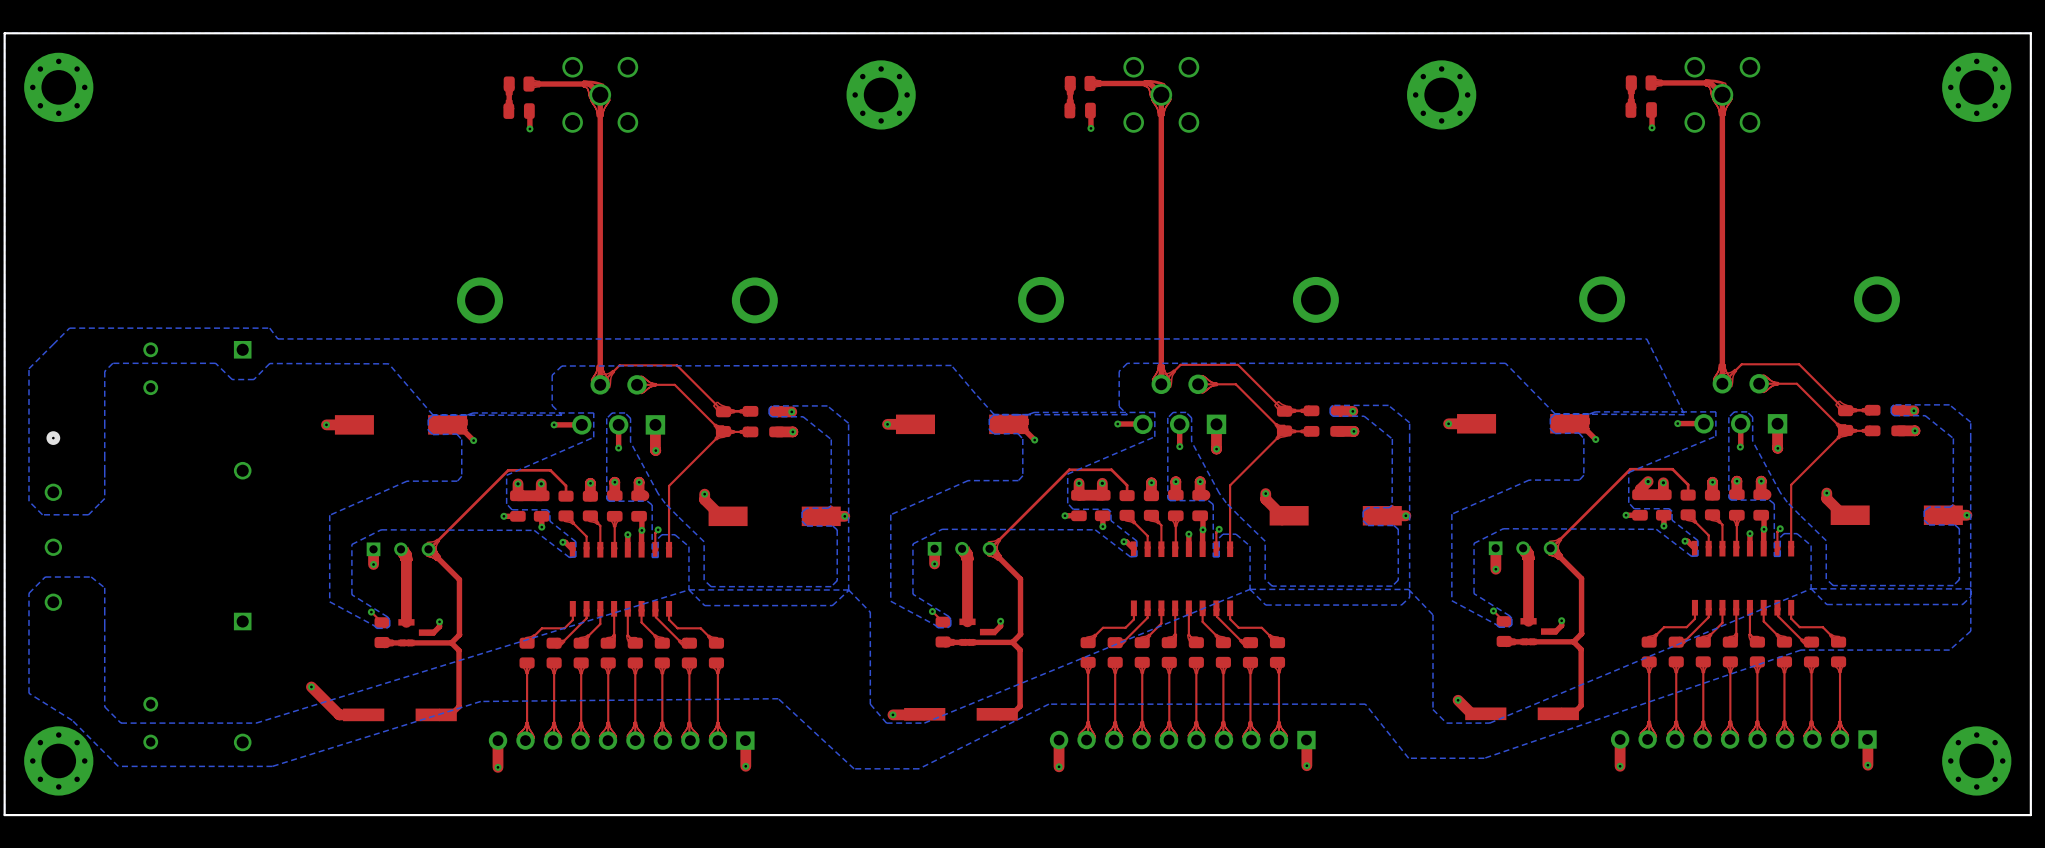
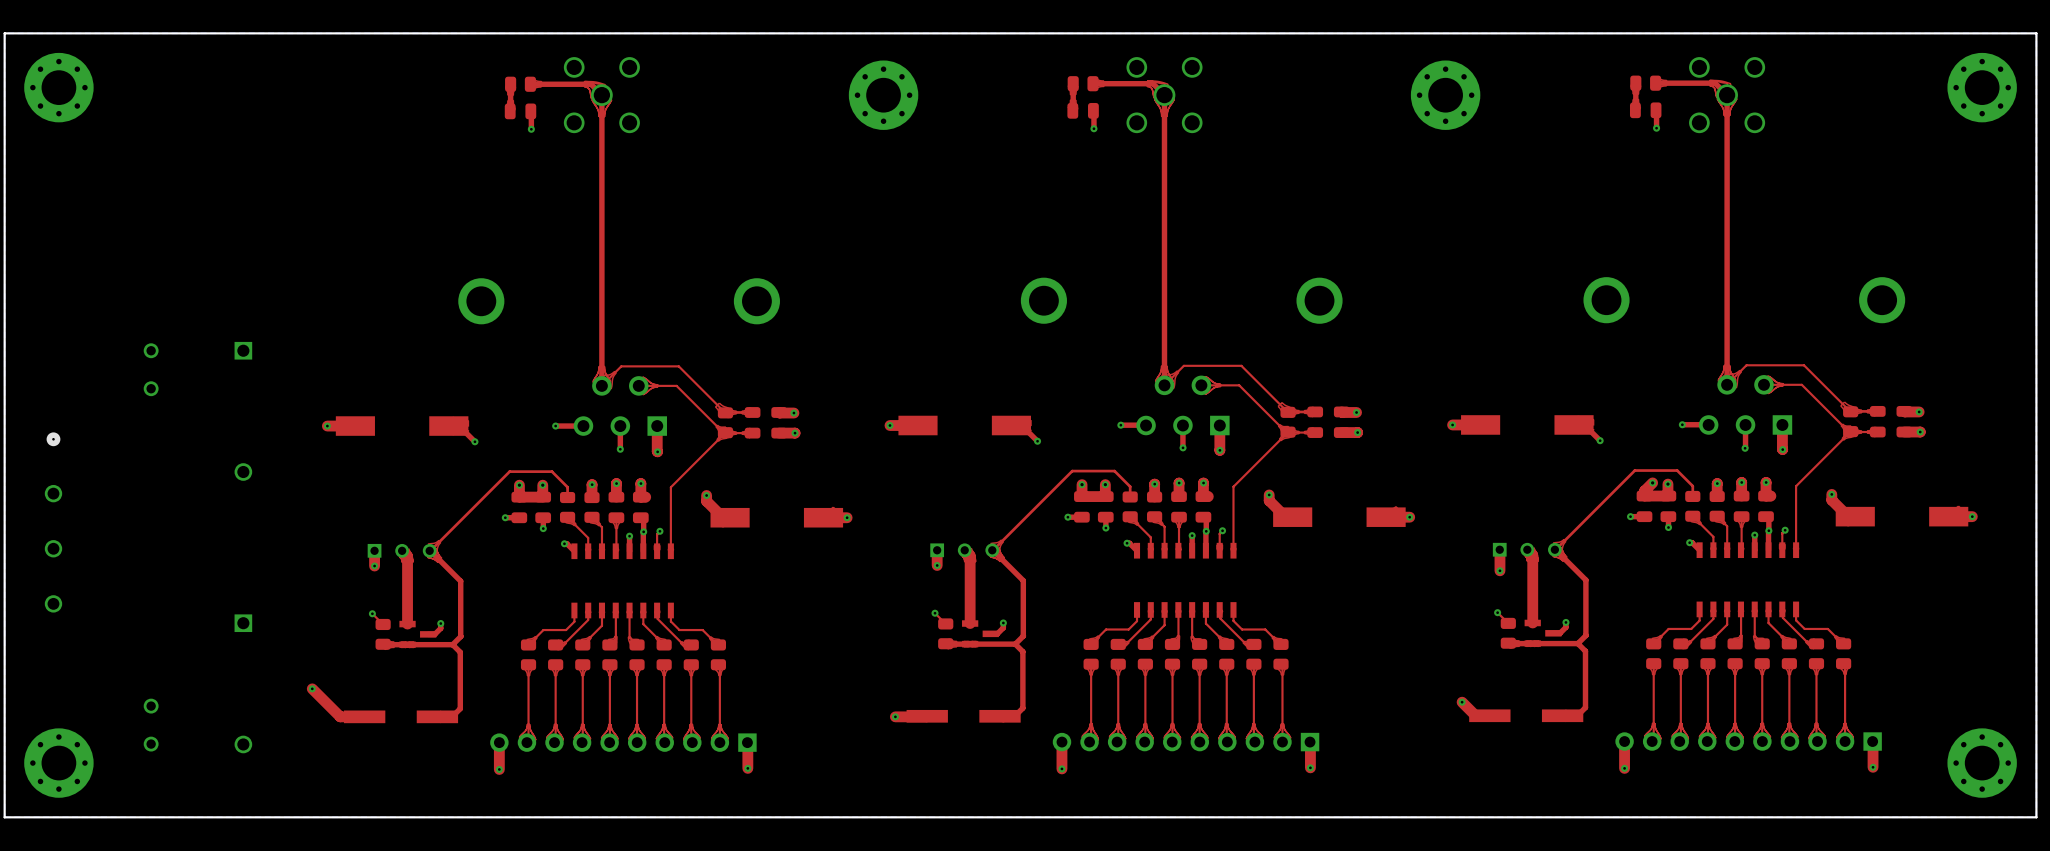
bottom zone outline: (994, 414) (1028, 414) (1034, 412) (1154, 412) (1154, 436) (1067, 474) (1067, 503) (1073, 509) (1108, 509) (1110, 511) (1110, 520) (1136, 541) (1136, 556) (1130, 556) (1095, 529) (942, 529) (912, 543) (912, 594) (950, 619) (950, 625) (947, 627) (937, 627) (890, 601) (890, 514) (968, 480) (1018, 480) (1022, 475) (1022, 438) (1017, 433) (994, 434) (989, 429) (989, 418) (994, 414) -> none
bottom zone outline: (994, 414) (951, 365) (561, 366) (552, 375) (552, 405) (561, 415) (433, 415) -> none
bottom zone outline: (1555, 414) (1589, 414) (1595, 411) (1715, 411) (1715, 436) (1628, 472) (1628, 502) (1634, 508) (1669, 508) (1672, 511) (1672, 520) (1698, 540) (1698, 555) (1691, 556) (1656, 529) (1503, 528) (1474, 543) (1474, 593) (1511, 618) (1511, 625) (1508, 627) (1498, 627) (1451, 600) (1451, 514) (1529, 480) (1579, 480) (1583, 475) (1583, 438) (1578, 433) (1555, 433) (1550, 429) (1550, 418) (1555, 414) -> none
bottom zone outline: (1555, 414) (1684, 414) (1646, 338) (277, 338) (269, 328) (69, 328) (28, 368) (28, 501) (42, 514) (88, 514) (104, 498) (104, 371) (112, 363) (215, 363) (232, 379) (253, 379) (269, 363) (388, 363) (433, 415) -> none
bottom zone outline: (1555, 414) (1505, 363) (1127, 363) (1119, 371) (1119, 406) (1127, 414) (994, 414) -> none
bottom zone outline: (433, 415) (467, 415) (473, 412) (593, 412) (593, 437) (506, 475) (506, 503) (512, 509) (547, 509) (549, 512) (549, 521) (575, 541) (575, 556) (569, 557) (534, 530) (381, 529) (351, 544) (351, 594) (389, 619) (389, 626) (386, 628) (376, 628) (329, 601) (329, 515) (407, 481) (457, 481) (461, 476) (461, 439) (456, 434) (433, 434) (428, 430) (428, 419) (433, 415) -> none
bottom zone outline: (1811, 588) (1811, 545) (1797, 533) (1784, 533) (1780, 537) (1780, 556) (1774, 556) (1774, 503) (1769, 500) (1731, 500) (1728, 497) (1728, 417) (1734, 411) (1747, 411) (1752, 417) (1752, 441) (1780, 492) (1787, 502) (1826, 540) (1826, 579) (1833, 585) (1953, 585) (1959, 579) (1959, 528) (1955, 524) (1929, 524) (1924, 520) (1924, 510) (1929, 507) (1950, 507) (1953, 504) (1953, 438) (1925, 415) (1893, 415) (1891, 412) (1891, 407) (1893, 404) (1949, 404) (1970, 422) (1970, 596) (1962, 604) (1826, 604) (1811, 588) -> none
bottom zone outline: (1811, 588) (1489, 723) (1446, 723) (1432, 709) (1432, 614) (1408, 589) (1250, 589) -> none
bottom zone outline: (1811, 588) (1970, 588) (1970, 631) (1949, 650) (1800, 650) (1484, 758) (1408, 758) (1365, 704) (1048, 704) (919, 768) (854, 768) (778, 698) (480, 701) (272, 766) (118, 766) (72, 720) (28, 693) (28, 593) (45, 577) (91, 577) (104, 587) (104, 706) (120, 723) (256, 723) (688, 589) -> none
bottom zone outline: (688, 589) (688, 546) (674, 534) (661, 534) (658, 538) (658, 557) (652, 557) (652, 504) (647, 501) (608, 501) (606, 499) (606, 418) (612, 412) (625, 412) (630, 418) (630, 442) (658, 493) (665, 503) (704, 541) (704, 580) (711, 586) (831, 586) (837, 580) (837, 529) (832, 526) (806, 526) (802, 521) (802, 511) (806, 508) (828, 508) (831, 505) (831, 439) (803, 416) (771, 416) (769, 414) (769, 408) (771, 405) (827, 405) (848, 423) (848, 590) (832, 605) (704, 605) (688, 589) -> none
bottom zone outline: (1250, 589) (924, 723) (886, 723) (870, 704) (870, 612) (848, 590) (688, 589) -> none
bottom zone outline: (1250, 589) (1250, 546) (1235, 534) (1222, 534) (1219, 537) (1219, 556) (1213, 556) (1213, 504) (1208, 500) (1169, 500) (1167, 498) (1167, 417) (1173, 412) (1186, 412) (1191, 417) (1191, 441) (1219, 493) (1226, 502) (1265, 541) (1265, 579) (1272, 586) (1392, 586) (1398, 580) (1398, 529) (1393, 525) (1367, 525) (1363, 520) (1363, 511) (1367, 507) (1389, 507) (1392, 505) (1392, 438) (1364, 416) (1332, 416) (1330, 413) (1330, 408) (1332, 405) (1388, 405) (1409, 422) (1409, 597) (1401, 605) (1265, 605) (1250, 589) -> none

